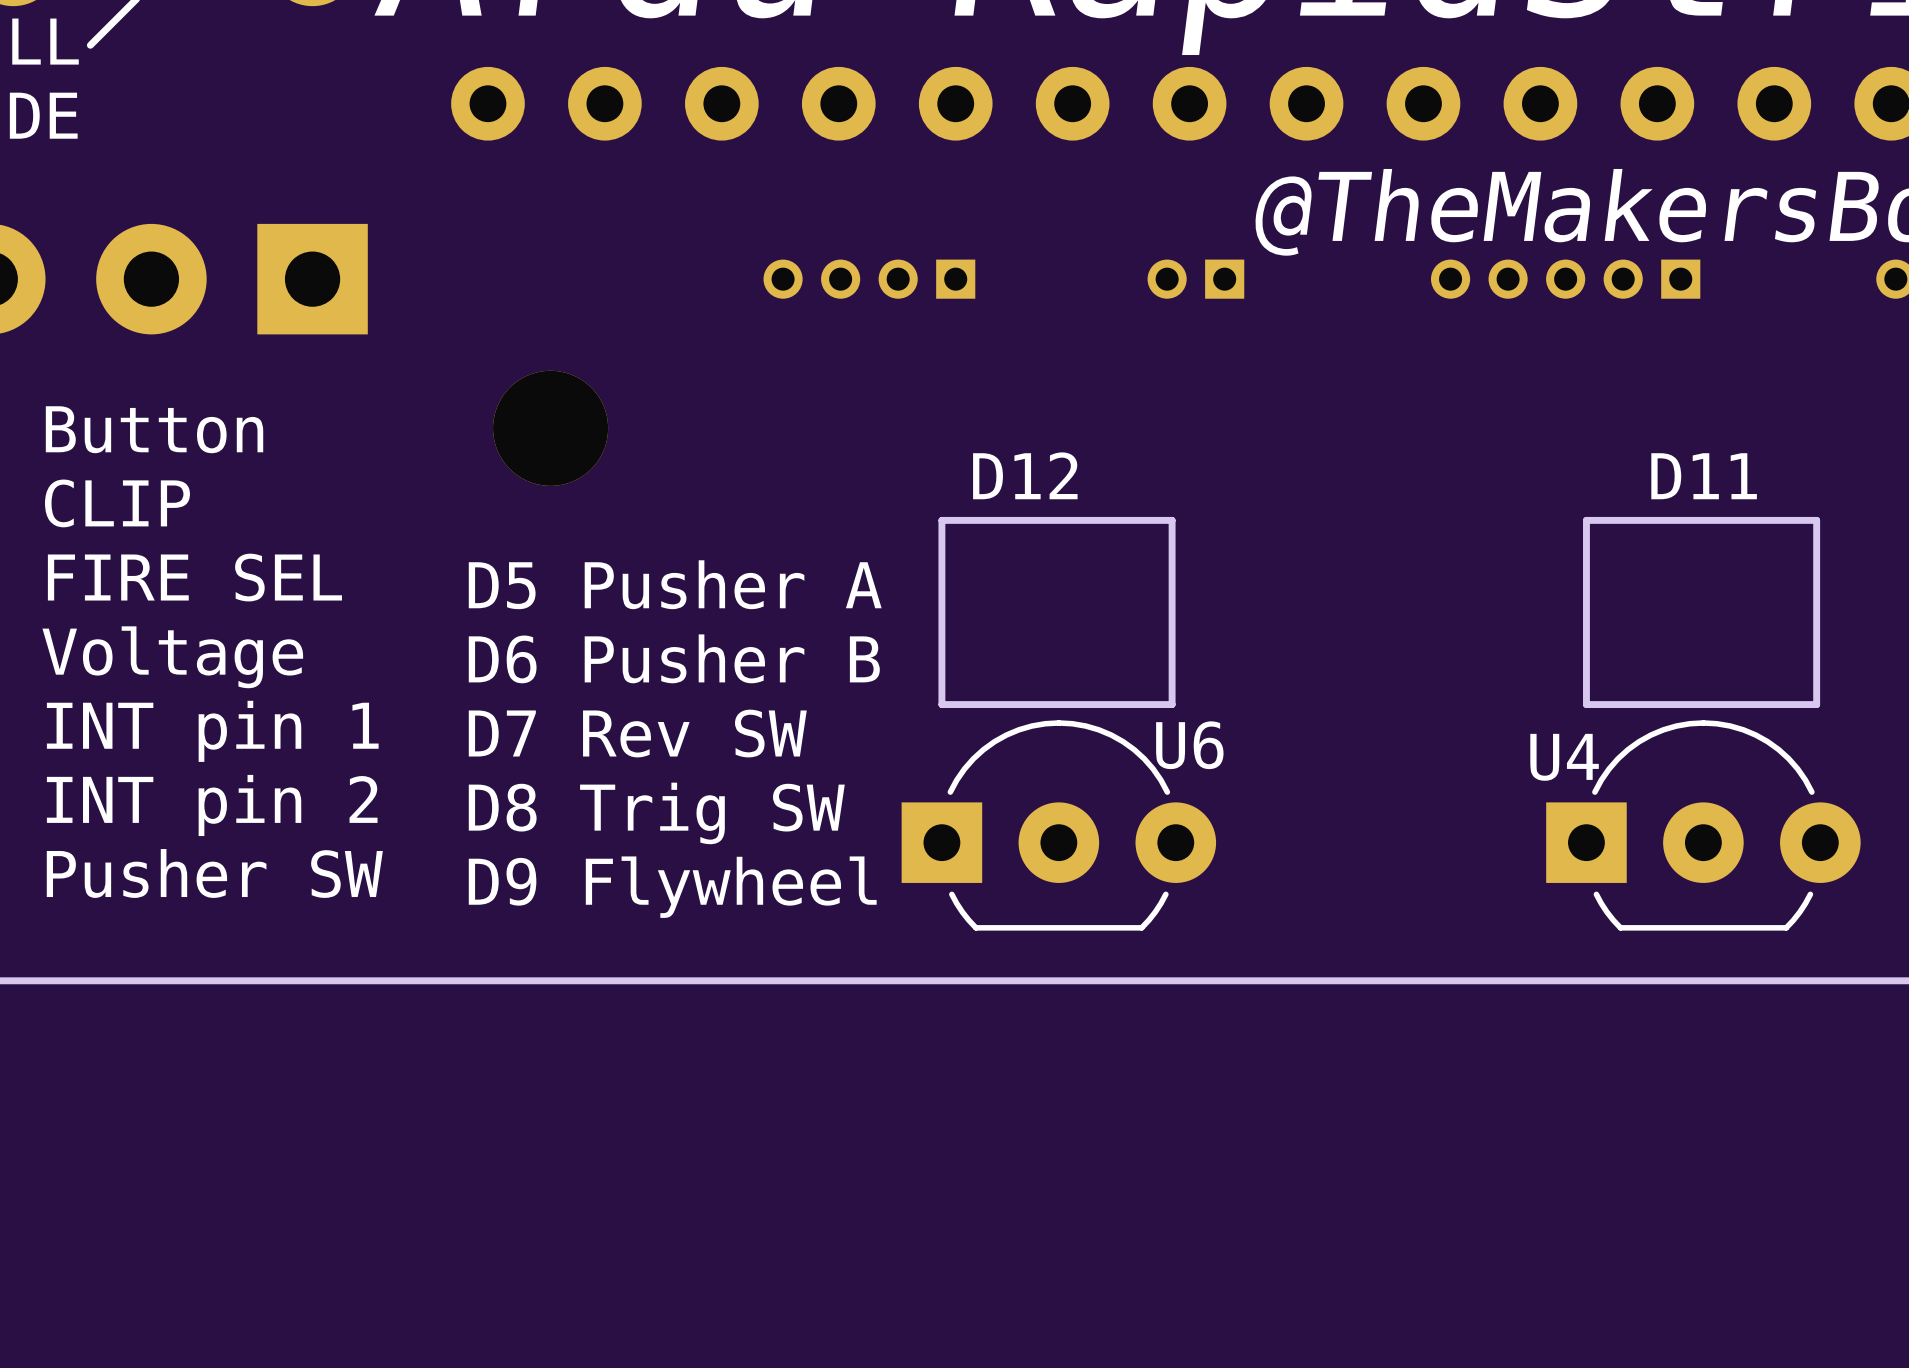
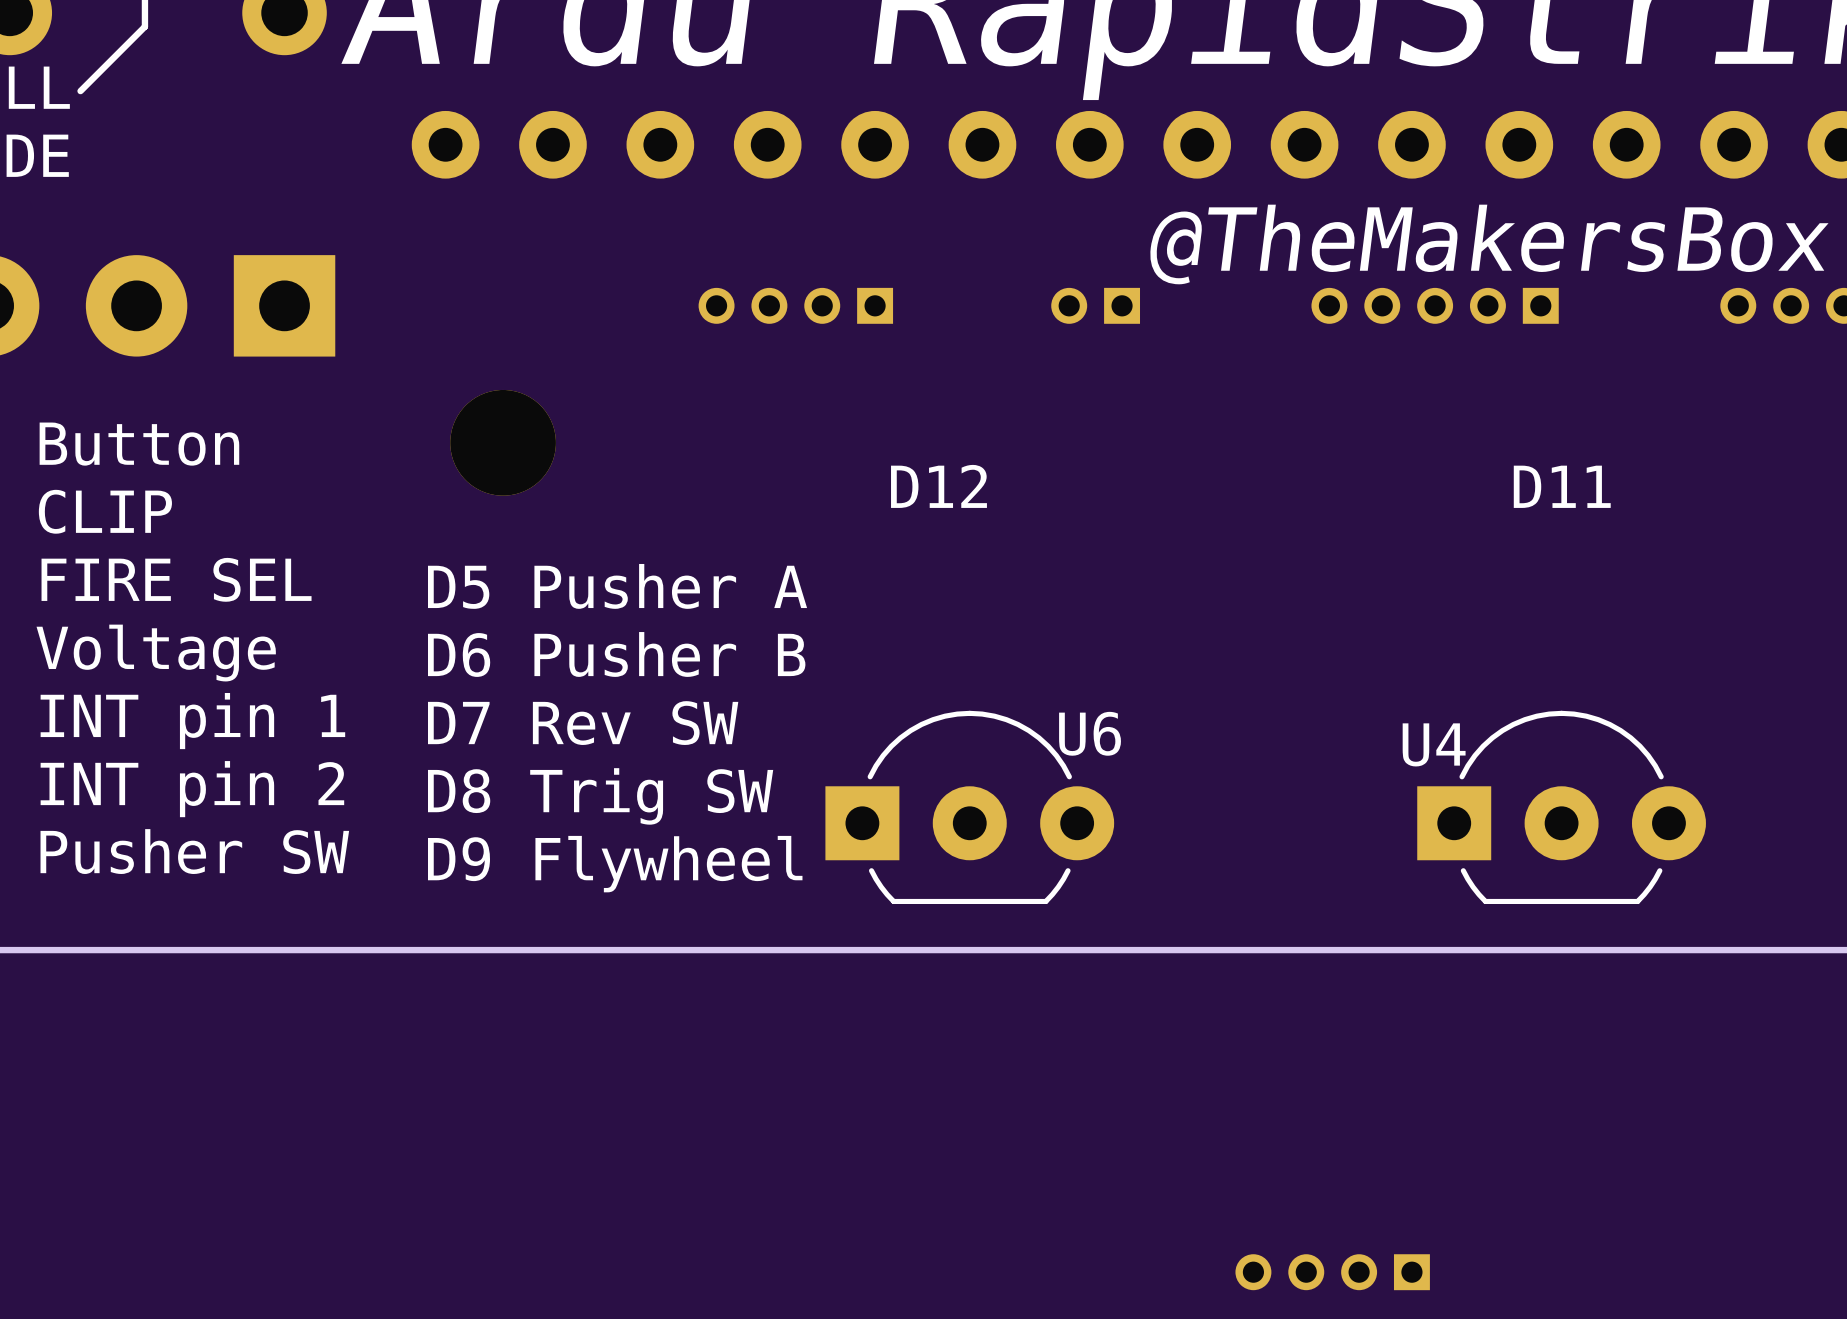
board edge: (1172, 520) (941, 520) (941, 704) (1172, 704) (1172, 520) -> none
board edge: (1816, 520) (1586, 520) (1586, 704) (1816, 704) (1816, 520) -> none
part: none -> (1332, 1272)

